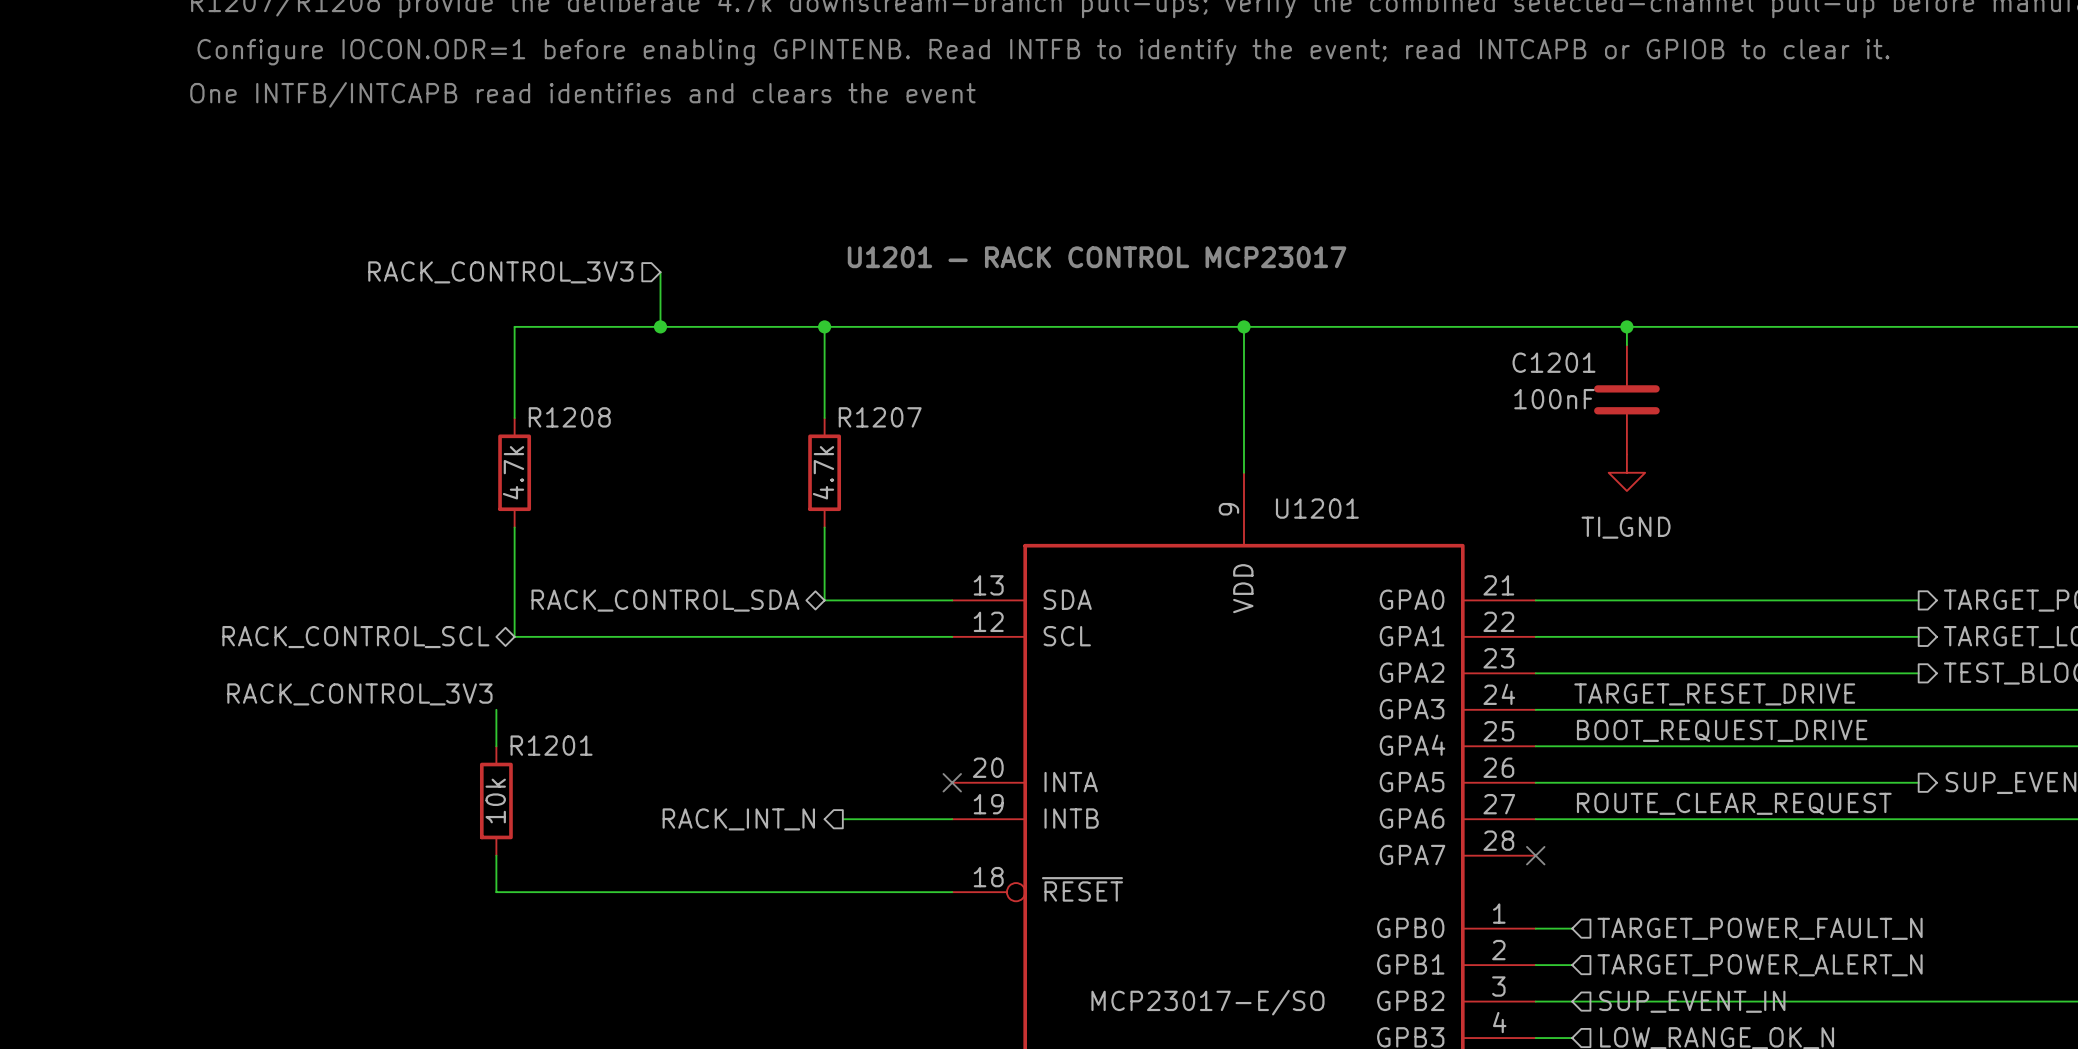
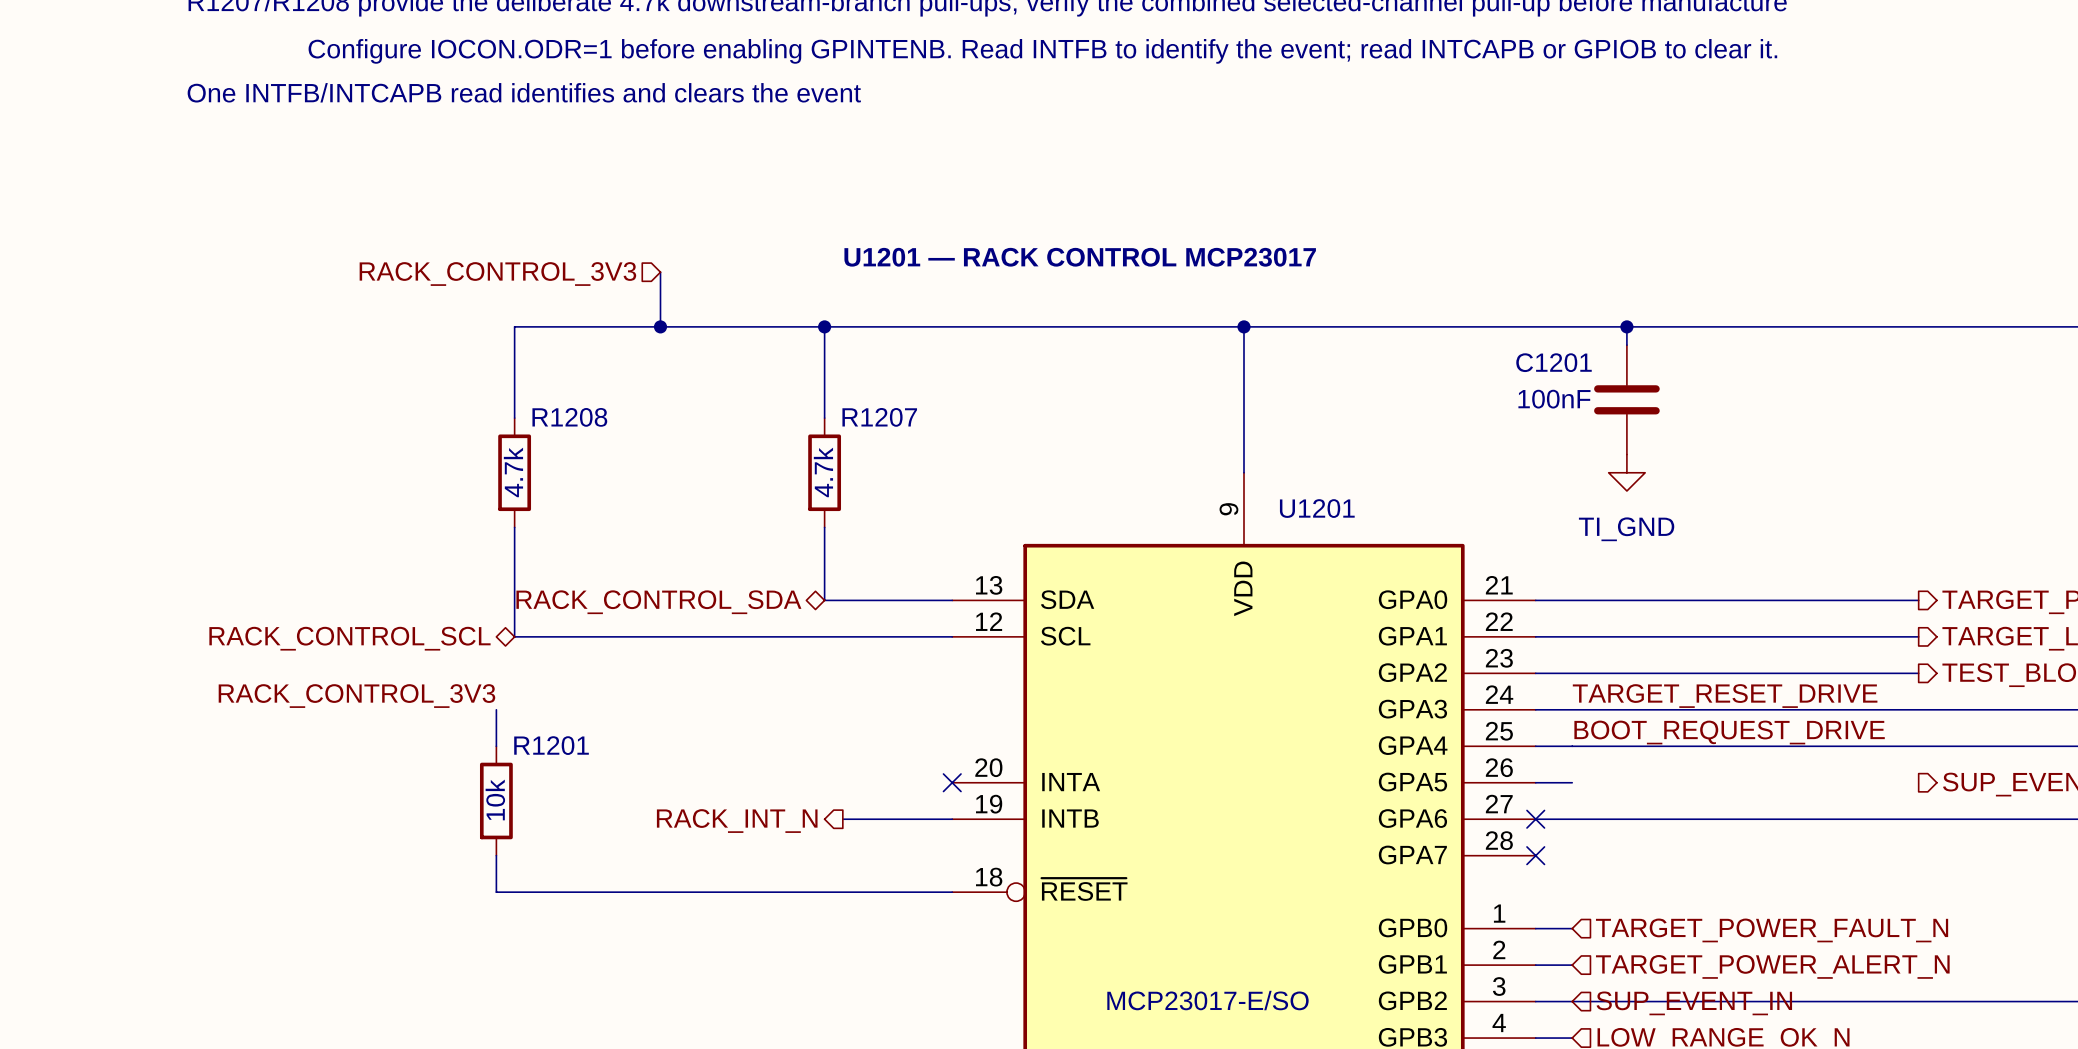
wire: (1572, 782) (1918, 782) -> none
label: ROUTE_CLEAR_REQUEST (1734, 803) -> none
no-connect mark: none -> (1535, 819)

